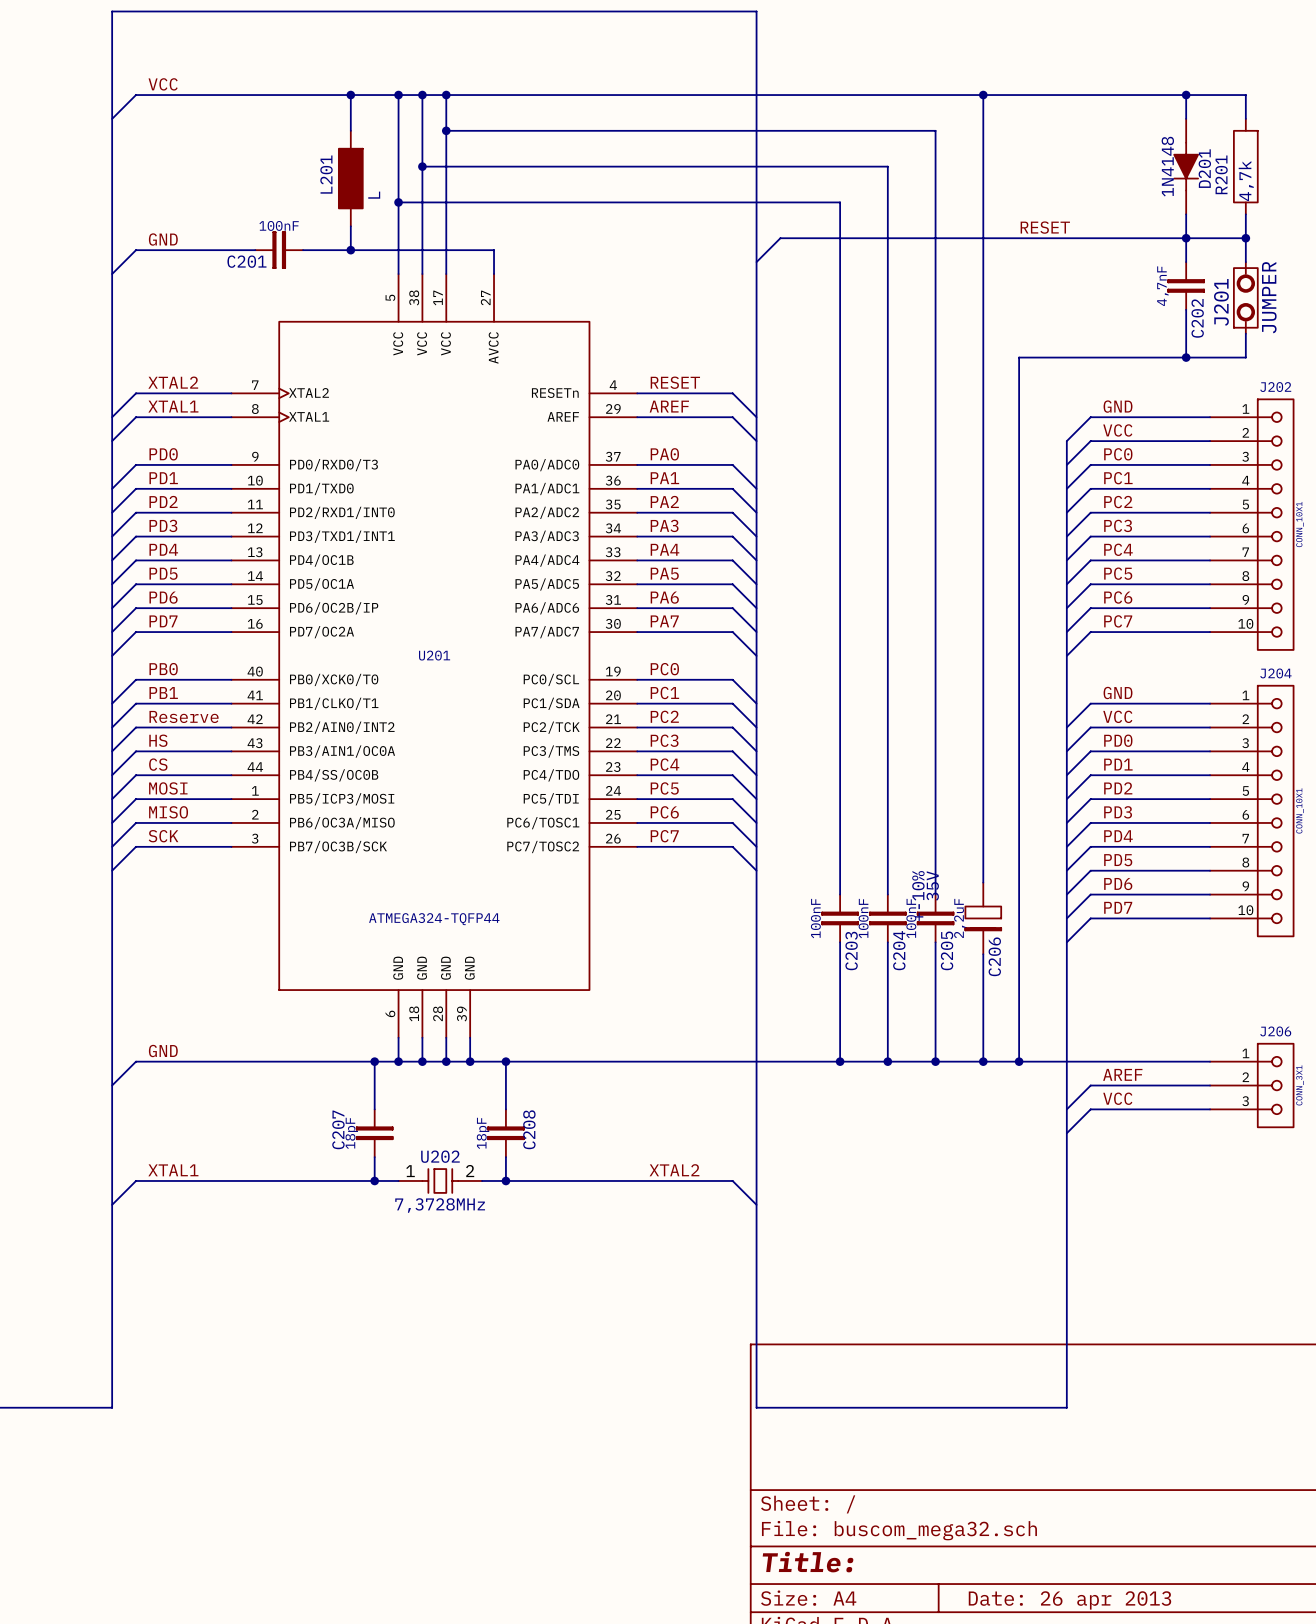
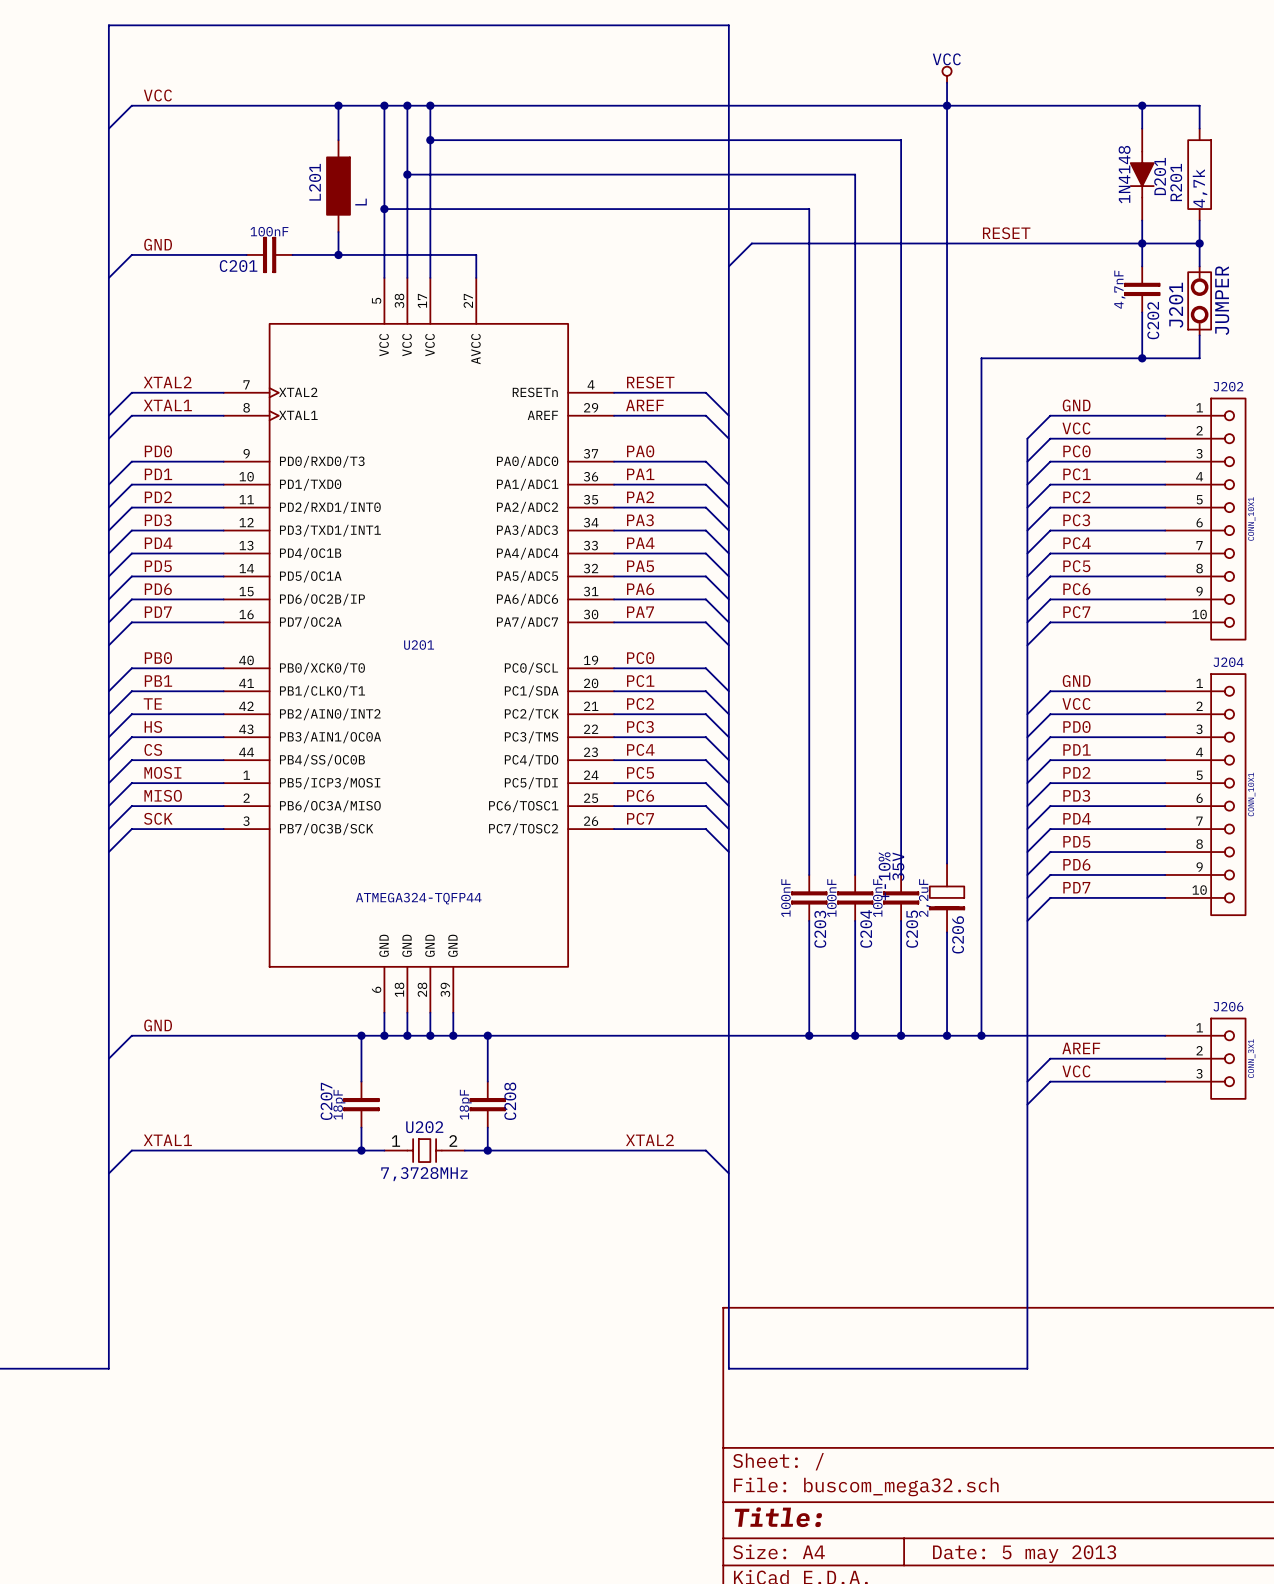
power symbol: none -> VCC (947, 74)
wire: none -> (947, 82) (947, 105)
label: Reserve (184, 716) -> TE (152, 704)
title block: Date: 26 apr 2013 (1069, 1600) -> Date: 5 may 2013 (1024, 1554)

